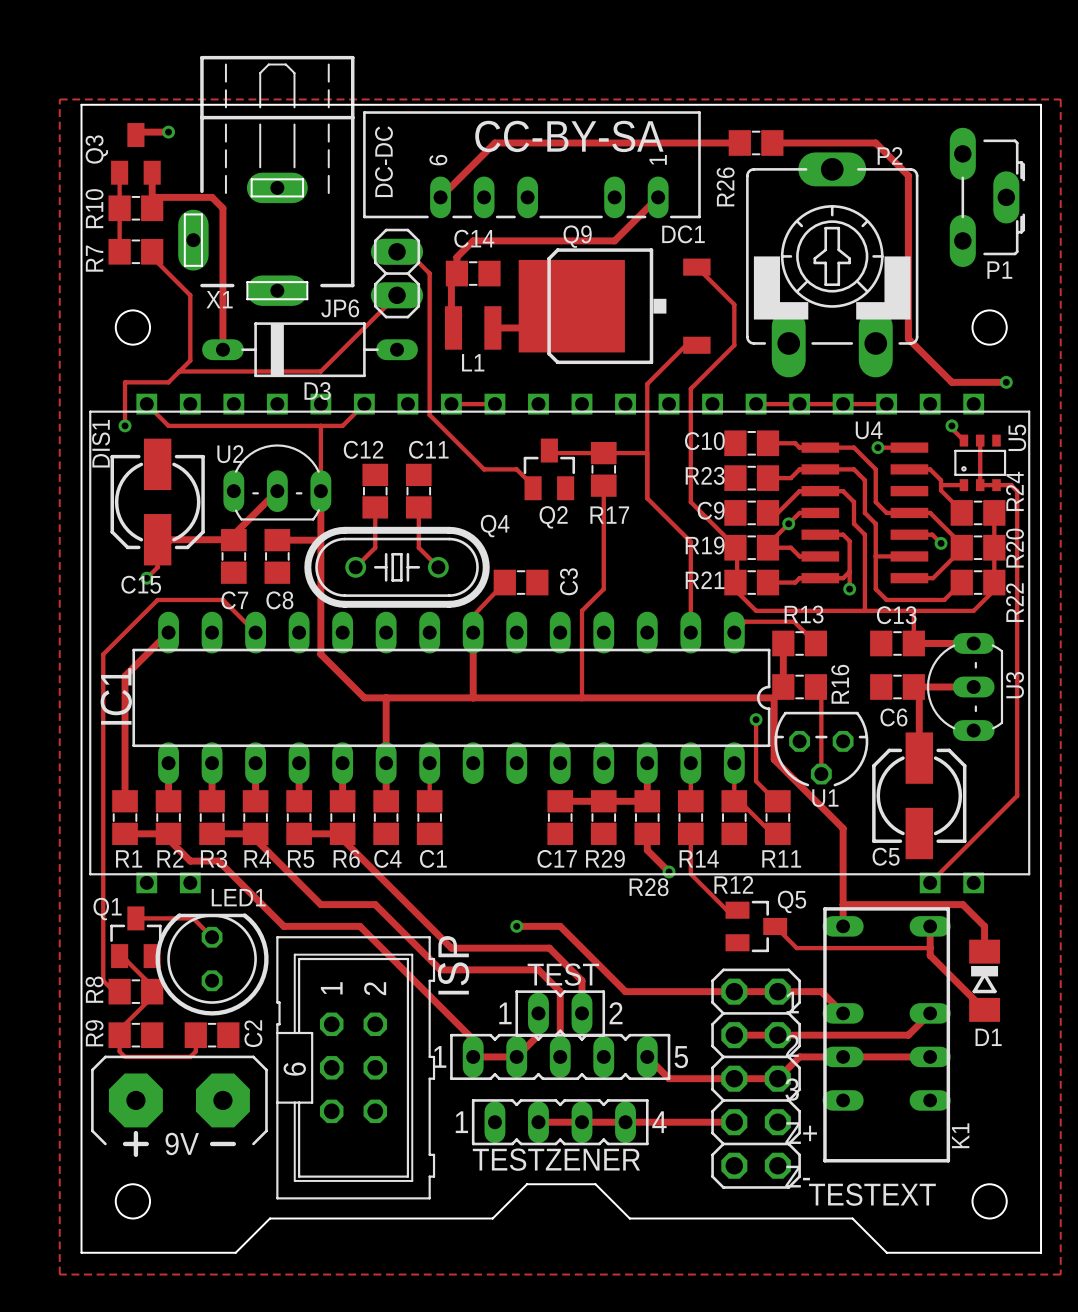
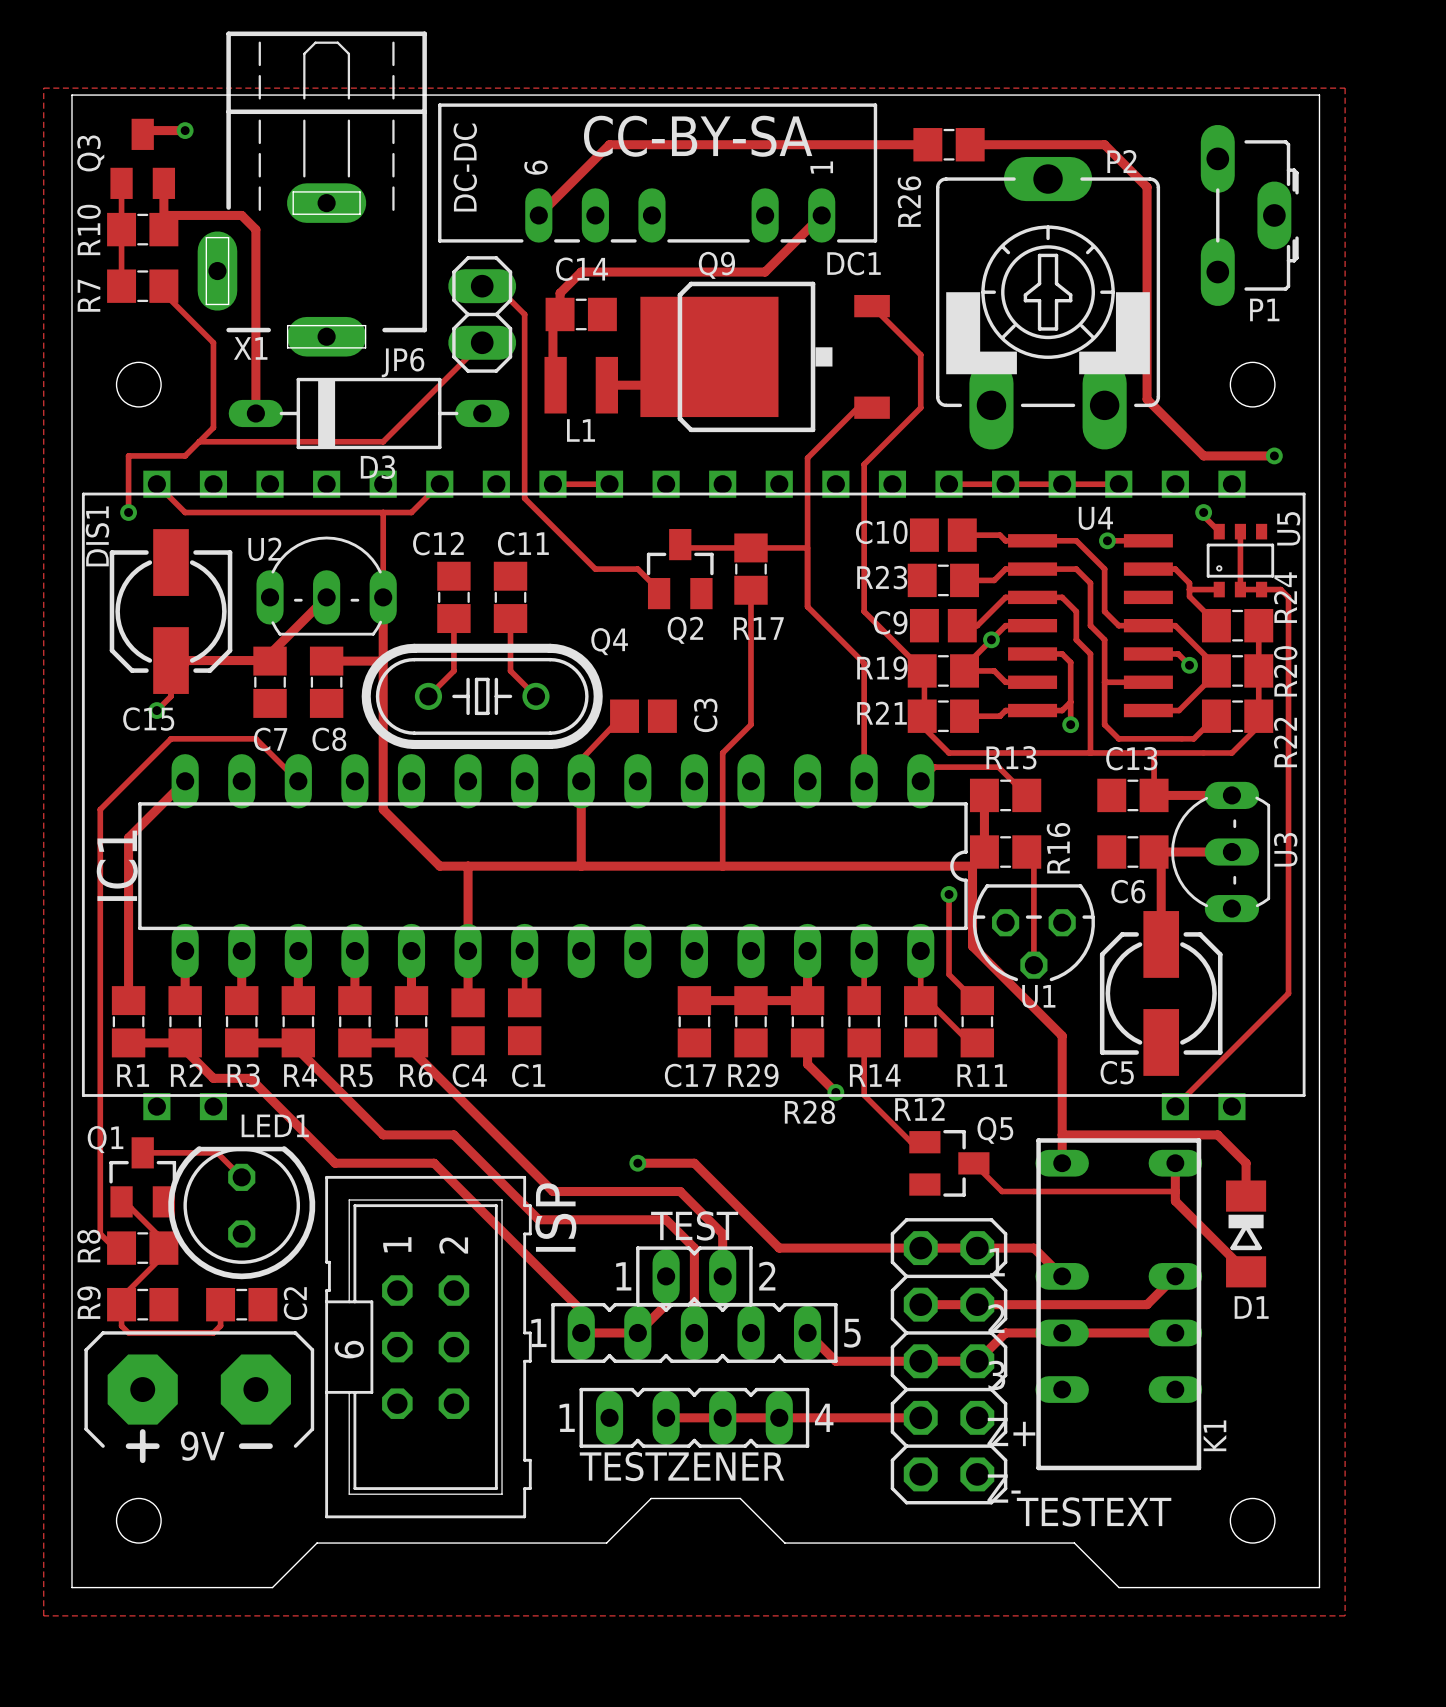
C10 footprint: [724, 430, 780, 457] -> [909, 518, 977, 552]
C9 footprint: [724, 500, 780, 526] -> [909, 608, 977, 643]
C3 footprint: [493, 569, 549, 596] -> [610, 699, 677, 733]
C4 footprint: [373, 790, 400, 845] -> [451, 988, 485, 1056]
C1 footprint: [416, 790, 443, 845] -> [507, 988, 542, 1056]

